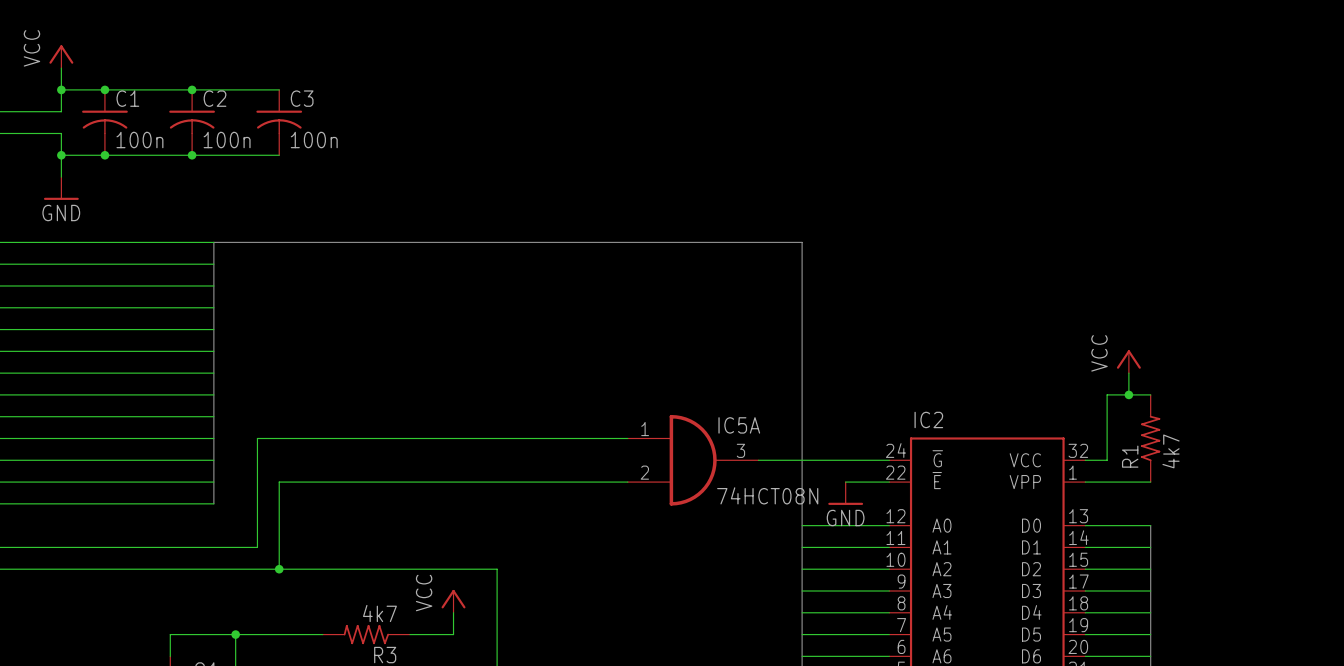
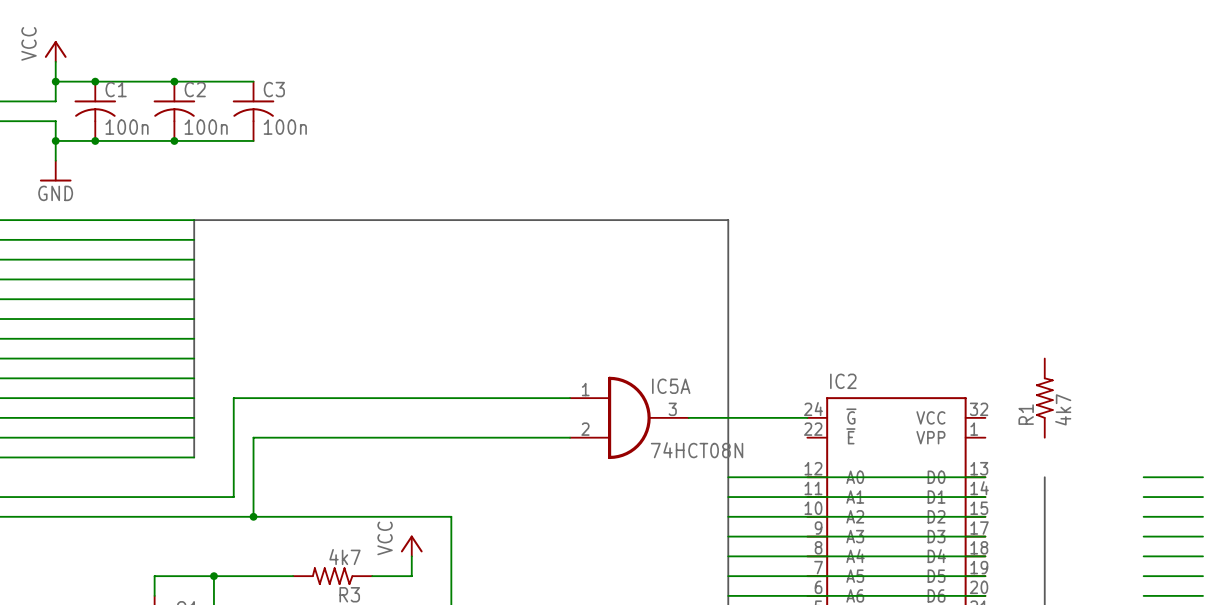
power symbol: VCC (1128, 361) -> none
wire: (1128, 373) (1128, 394) -> none
junction: (1128, 394) -> none
wire: (1150, 394) (1107, 394) (1107, 460) (1085, 460) -> none
wire: (845, 482) (889, 482) -> none
wire: (1085, 482) (1150, 482) -> (1143, 477) (1203, 477)
power symbol: GND (845, 493) -> none
wire: (1085, 525) (1150, 525) -> (985, 477) (807, 477)
wire: (1085, 547) (1150, 547) -> (985, 497) (807, 497)
wire: none -> (1143, 497) (1203, 497)
wire: (1085, 569) (1150, 569) -> (985, 516) (807, 516)
wire: none -> (1143, 516) (1203, 516)
wire: (1085, 590) (1150, 590) -> (985, 536) (807, 536)
wire: none -> (1143, 536) (1203, 536)
wire: (1085, 612) (1150, 612) -> (985, 556) (807, 556)
wire: none -> (1143, 556) (1203, 556)
wire: (1085, 634) (1150, 634) -> (985, 576) (807, 576)
wire: none -> (1143, 576) (1203, 576)
wire: (1085, 656) (1150, 656) -> (985, 595) (807, 595)
wire: none -> (1143, 595) (1203, 595)

